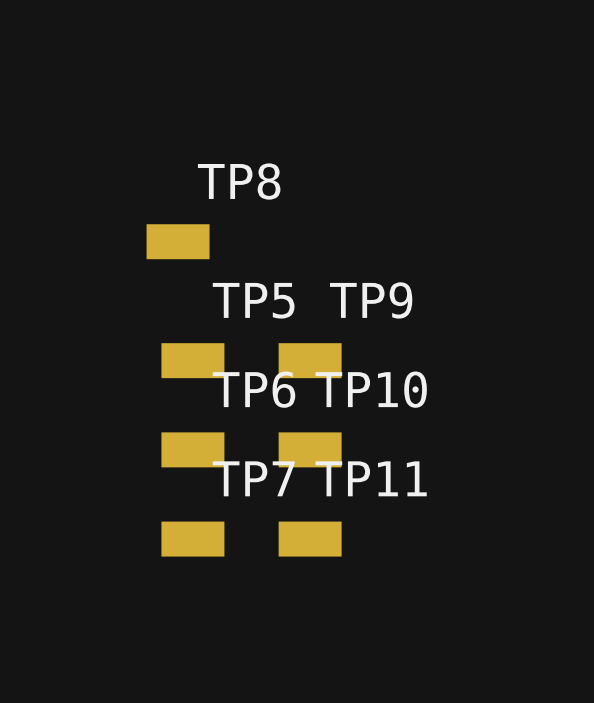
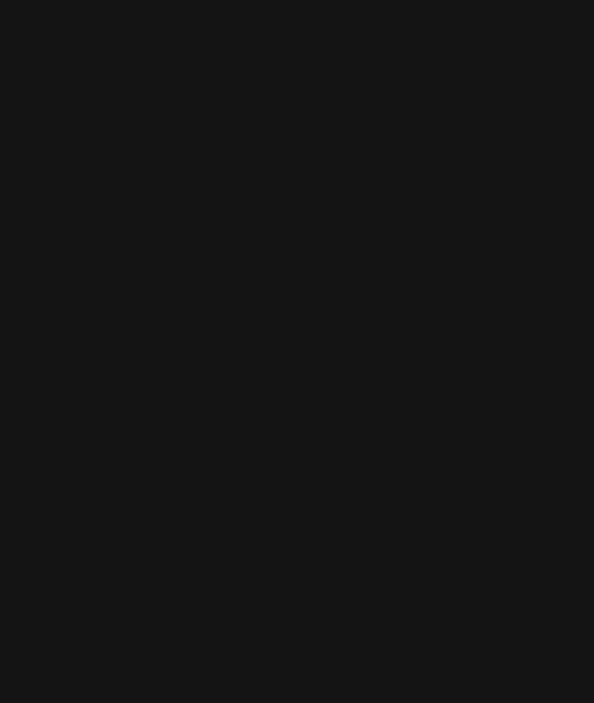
TP8: (178, 241) -> none
TP5: (192, 360) -> none
TP9: (310, 360) -> none
TP6: (192, 449) -> none
TP10: (310, 449) -> none
TP7: (192, 539) -> none
TP11: (310, 539) -> none

